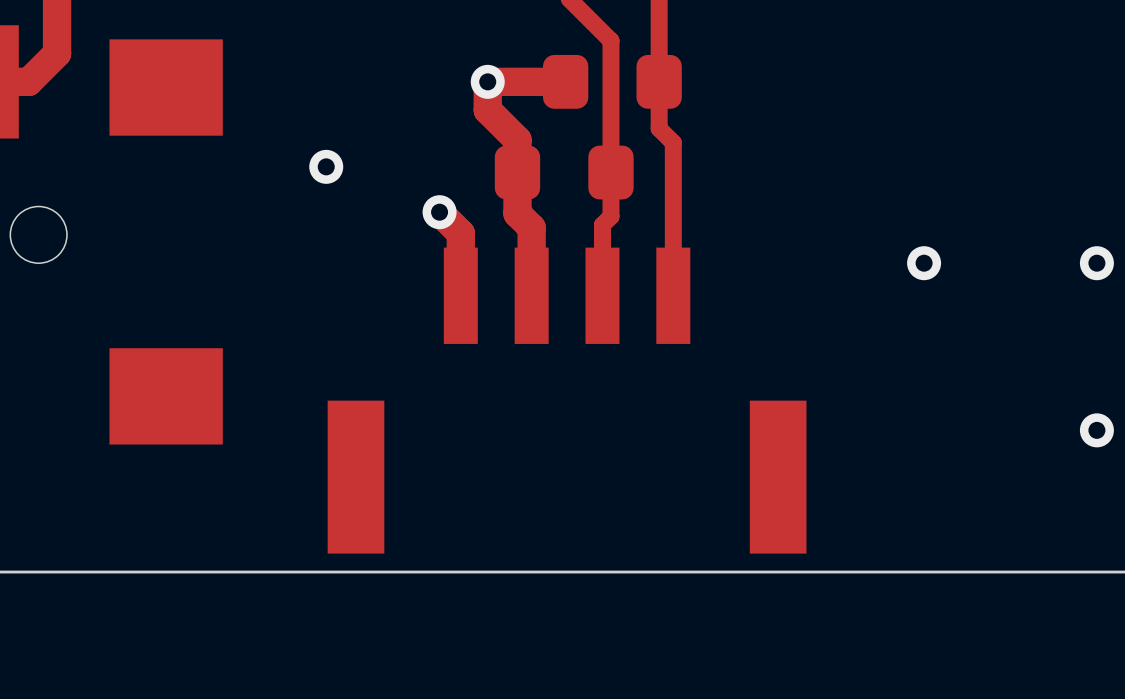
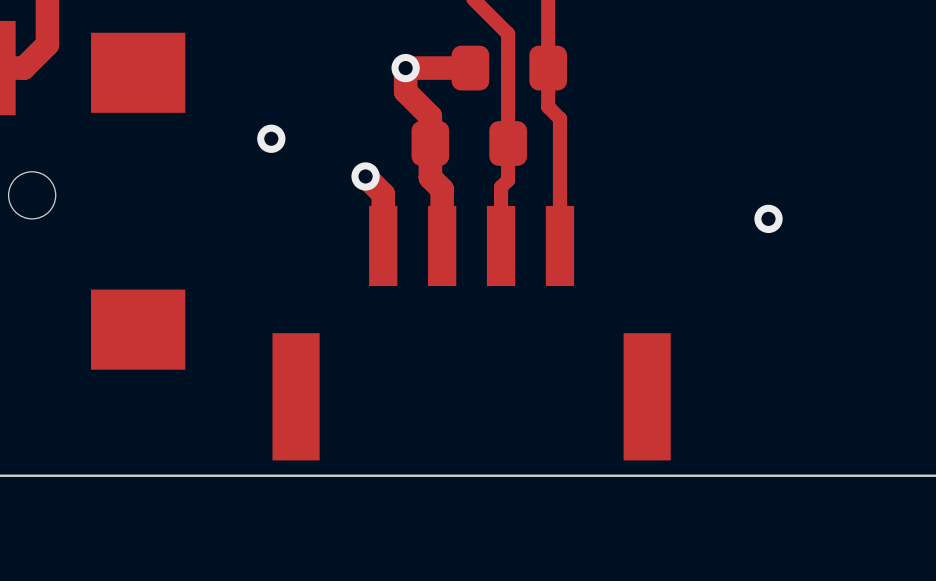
via: (1096, 263) -> none
via: (1096, 430) -> none

